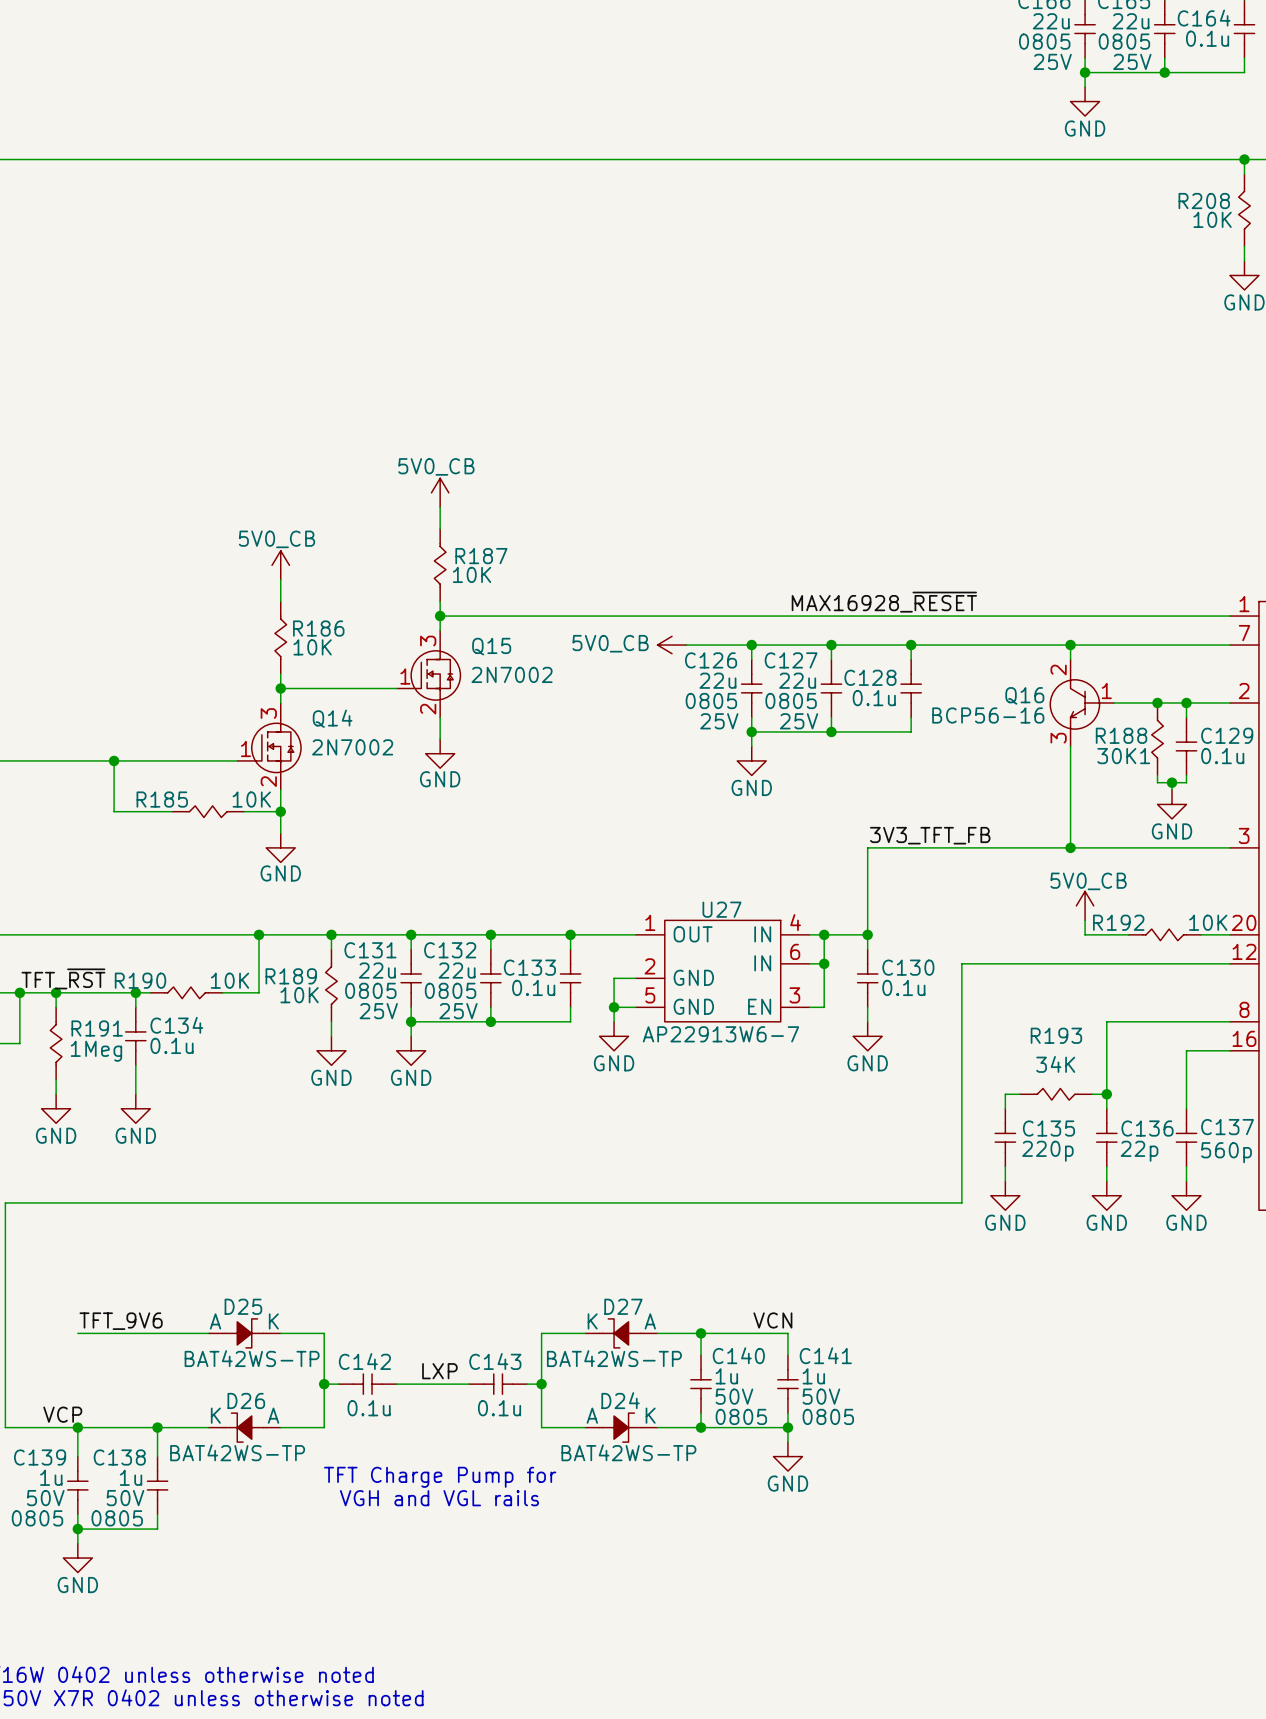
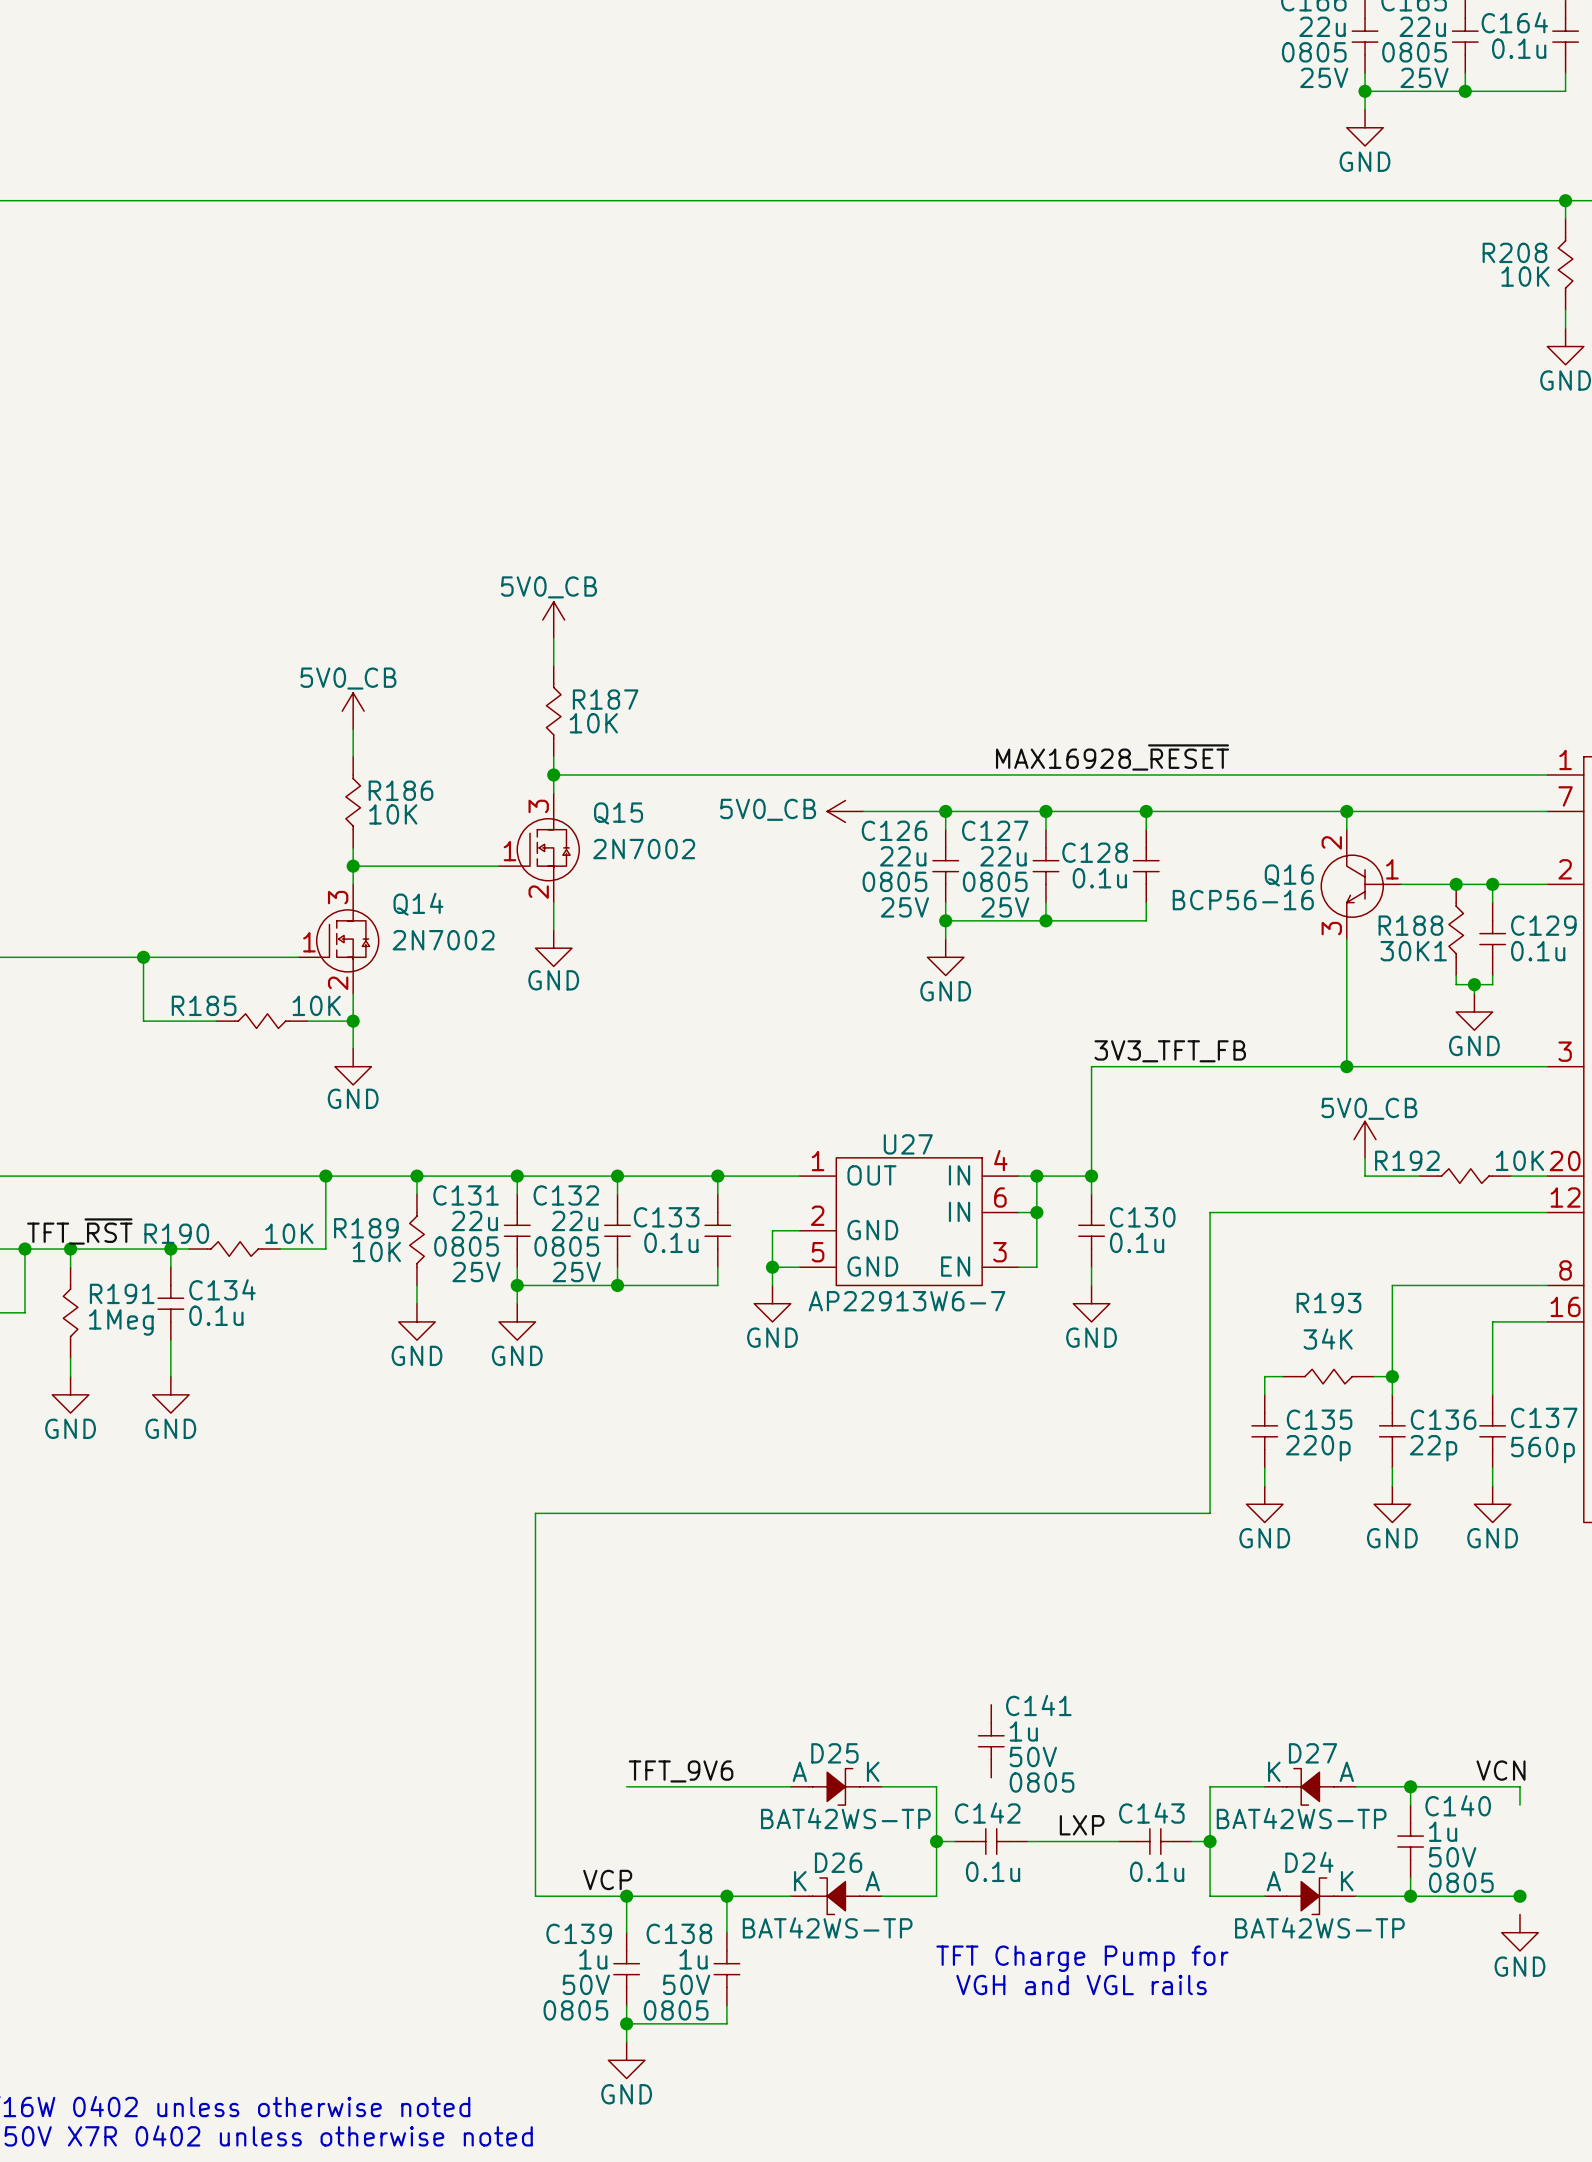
wire: (425, 1202) (5, 1202) (5, 1427) (208, 1427) -> (535, 1513) (535, 1896) (790, 1896)
label: VCN (772, 1320) -> none
label: TFT_9V6 (121, 1321) -> none
wire: (77, 1333) (208, 1333) -> none
D25 position: (244, 1333) -> (836, 1786)
wire: (280, 1333) (324, 1333) (324, 1427) (280, 1427) -> none
wire: (585, 1333) (541, 1333) (541, 1427) (585, 1427) -> none
D27 position: (621, 1333) -> (1310, 1786)
wire: (657, 1333) (787, 1333) (787, 1355) -> none
wire: (701, 1333) (701, 1355) -> none
junction: (701, 1333) -> none
label: LXP (439, 1371) -> none
wire: (324, 1384) (338, 1384) -> none
junction: (324, 1384) -> none
C142 position: (367, 1384) -> (991, 1841)
wire: (396, 1384) (469, 1384) -> none
C143 position: (498, 1384) -> (1155, 1841)
wire: (527, 1384) (541, 1384) -> (936, 1841) (954, 1841)
junction: (541, 1384) -> none
C140 position: (701, 1384) -> (1410, 1841)
label: none -> VCN (1501, 1770)
label: none -> TFT_9V6 (681, 1771)
wire: (701, 1413) (701, 1427) -> none
wire: (787, 1413) (787, 1442) -> (726, 1896) (726, 1932)
label: VCP (62, 1414) -> none
wire: none -> (881, 1786) (936, 1786) (936, 1896) (881, 1896)
wire: none -> (1264, 1786) (1210, 1786) (1210, 1896) (1264, 1896)
wire: none -> (1355, 1786) (1519, 1786) (1519, 1805)
wire: none -> (1410, 1786) (1410, 1805)
junction: none -> (1410, 1786)
wire: (77, 1427) (77, 1456) -> none
junction: (77, 1427) -> none
wire: (157, 1427) (157, 1456) -> none
junction: (157, 1427) -> none
D26 position: (244, 1427) -> (836, 1896)
D24 position: (621, 1427) -> (1310, 1896)
wire: (657, 1427) (787, 1427) -> (626, 1786) (790, 1786)
junction: (701, 1427) -> none
junction: (787, 1427) -> none
label: none -> LXP (1082, 1825)
power symbol: GND (787, 1456) -> none
junction: none -> (936, 1841)
wire: none -> (1027, 1841) (1118, 1841)
wire: none -> (1191, 1841) (1210, 1841)
junction: none -> (1210, 1841)
text: TFT Charge Pump for (440, 1477) -> none
C139 position: (77, 1485) -> (626, 1969)
C138 position: (157, 1485) -> (726, 1969)
wire: none -> (1410, 1878) (1410, 1896)
label: none -> VCP (607, 1879)
text: VGH and VGL rails (439, 1498) -> none
wire: none -> (626, 1896) (626, 1932)
junction: none -> (626, 1896)
junction: none -> (726, 1896)
wire: none -> (1355, 1896) (1519, 1896)
junction: none -> (1410, 1896)
junction: none -> (1519, 1896)
wire: (77, 1514) (77, 1543) -> none
wire: (157, 1514) (157, 1529) (77, 1529) -> none
junction: (77, 1529) -> none
power symbol: none -> GND (1519, 1932)
text: none -> TFT Charge Pump for (1082, 1958)
power symbol: GND (77, 1558) -> none
text: none -> VGH and VGL rails (1081, 1985)
wire: none -> (626, 2005) (626, 2042)
wire: none -> (726, 2005) (726, 2023) (626, 2023)
junction: none -> (626, 2023)
power symbol: none -> GND (626, 2060)

